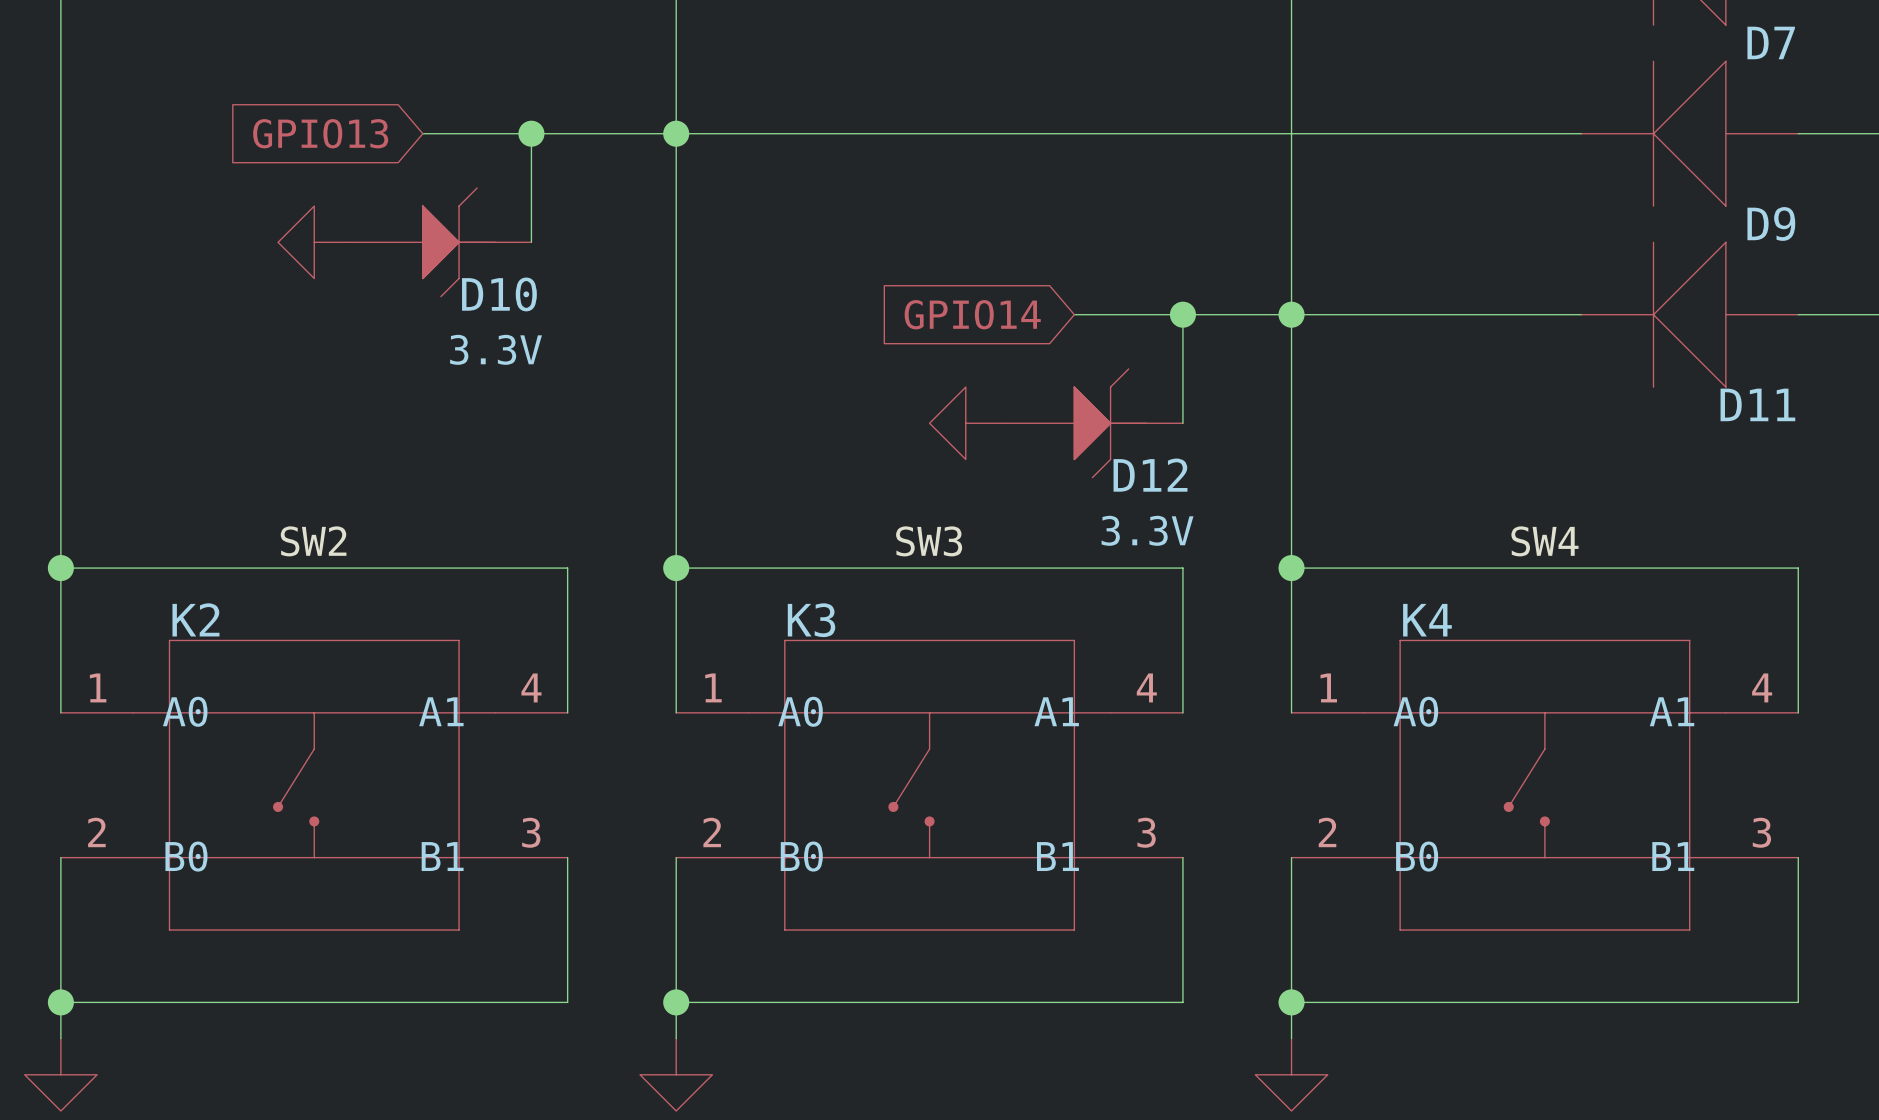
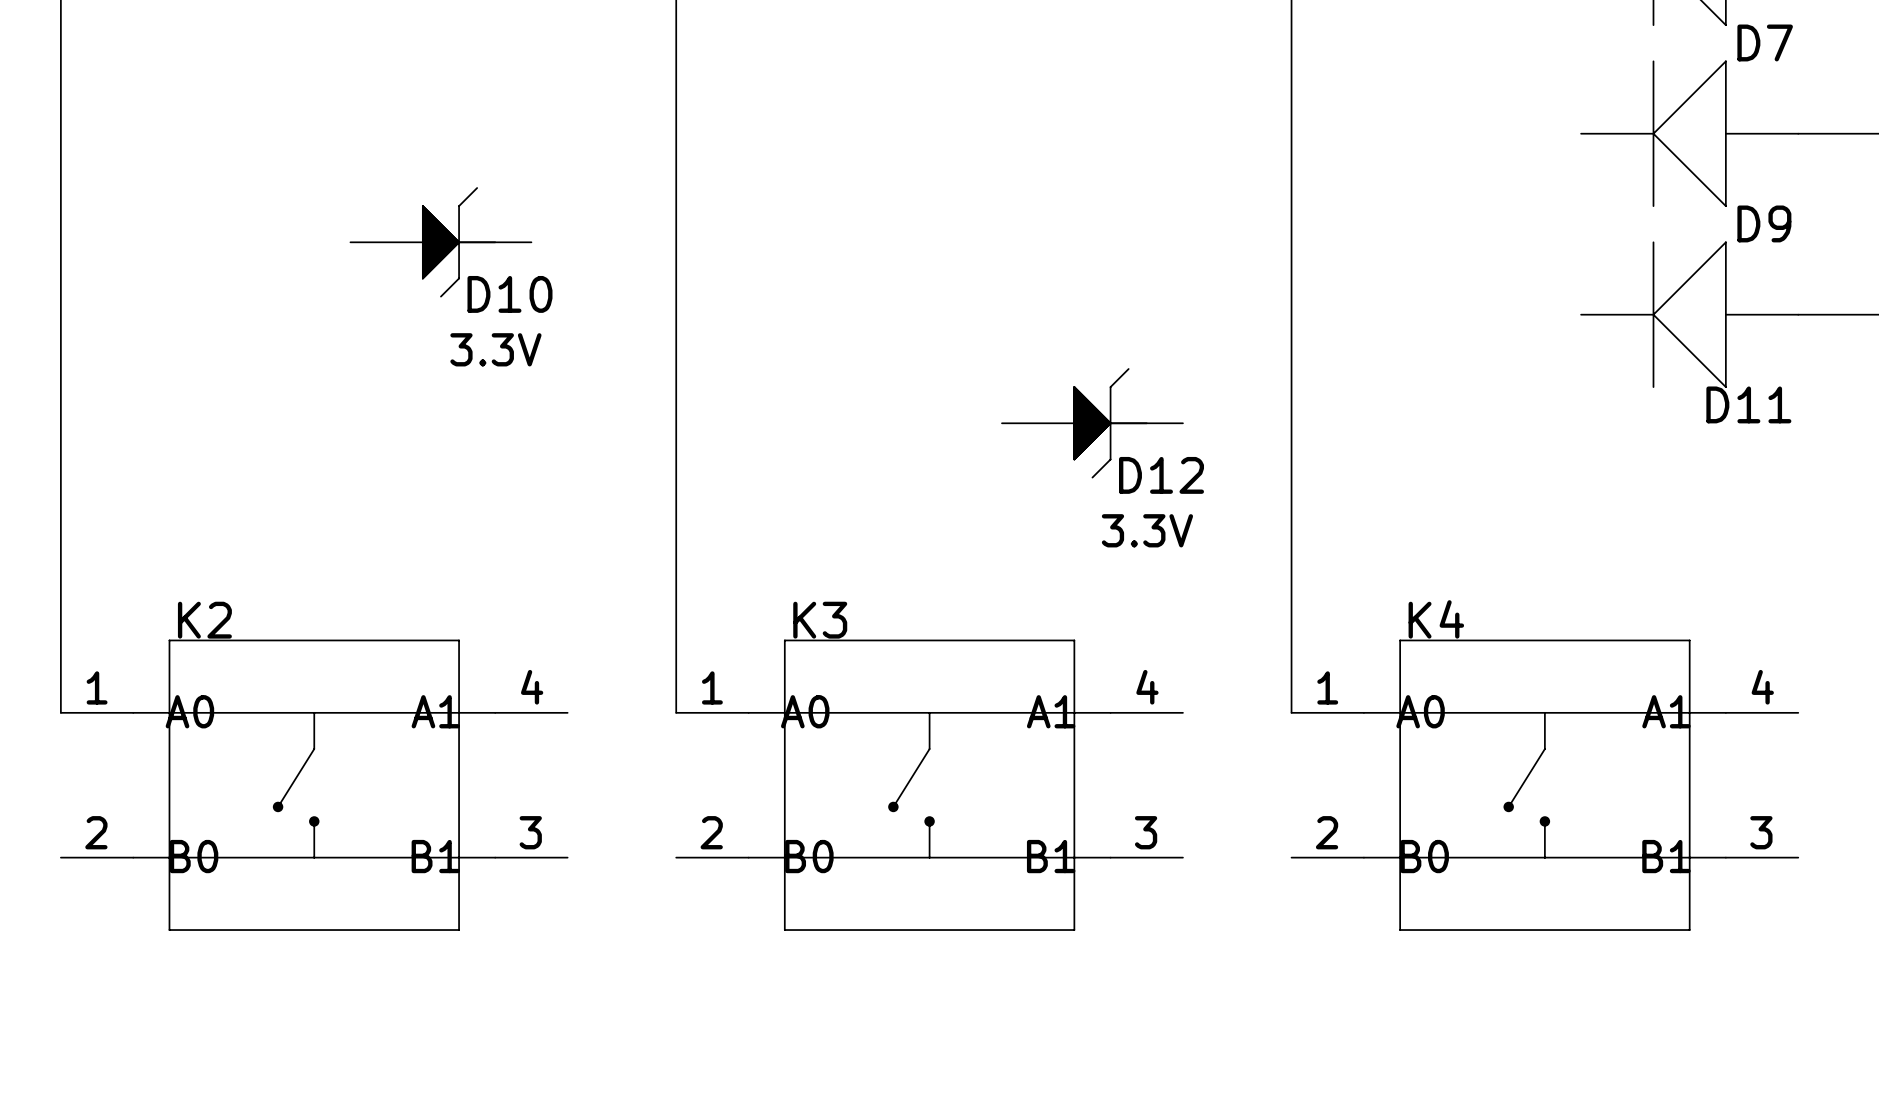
global label: GPIO13 (320, 133) -> none
wire: (422, 133) (1581, 133) -> none
wire: (531, 133) (531, 242) -> none
junction: (531, 133) -> none
junction: (676, 133) -> none
power symbol: (314, 242) -> none
global label: GPIO14 (972, 314) -> none
wire: (1074, 314) (1581, 314) -> none
wire: (1182, 314) (1182, 423) -> none
junction: (1182, 314) -> none
junction: (1291, 314) -> none
power symbol: (965, 423) -> none
label: SW2 (313, 541) -> none
label: SW3 (929, 541) -> none
label: SW4 (1544, 541) -> none
wire: (60, 568) (567, 568) (567, 712) -> none
junction: (60, 568) -> none
wire: (676, 568) (1182, 568) (1182, 712) -> none
junction: (676, 568) -> none
wire: (1291, 568) (1798, 568) (1798, 712) -> none
junction: (1291, 568) -> none
wire: (60, 857) (60, 1038) -> none
wire: (567, 857) (567, 1002) (60, 1002) -> none
wire: (676, 857) (676, 1038) -> none
wire: (1182, 857) (1182, 1002) (676, 1002) -> none
wire: (1291, 857) (1291, 1038) -> none
wire: (1798, 857) (1798, 1002) (1291, 1002) -> none
junction: (60, 1002) -> none
junction: (676, 1002) -> none
junction: (1291, 1002) -> none
power symbol: (60, 1074) -> none
power symbol: (676, 1074) -> none
power symbol: (1291, 1074) -> none

